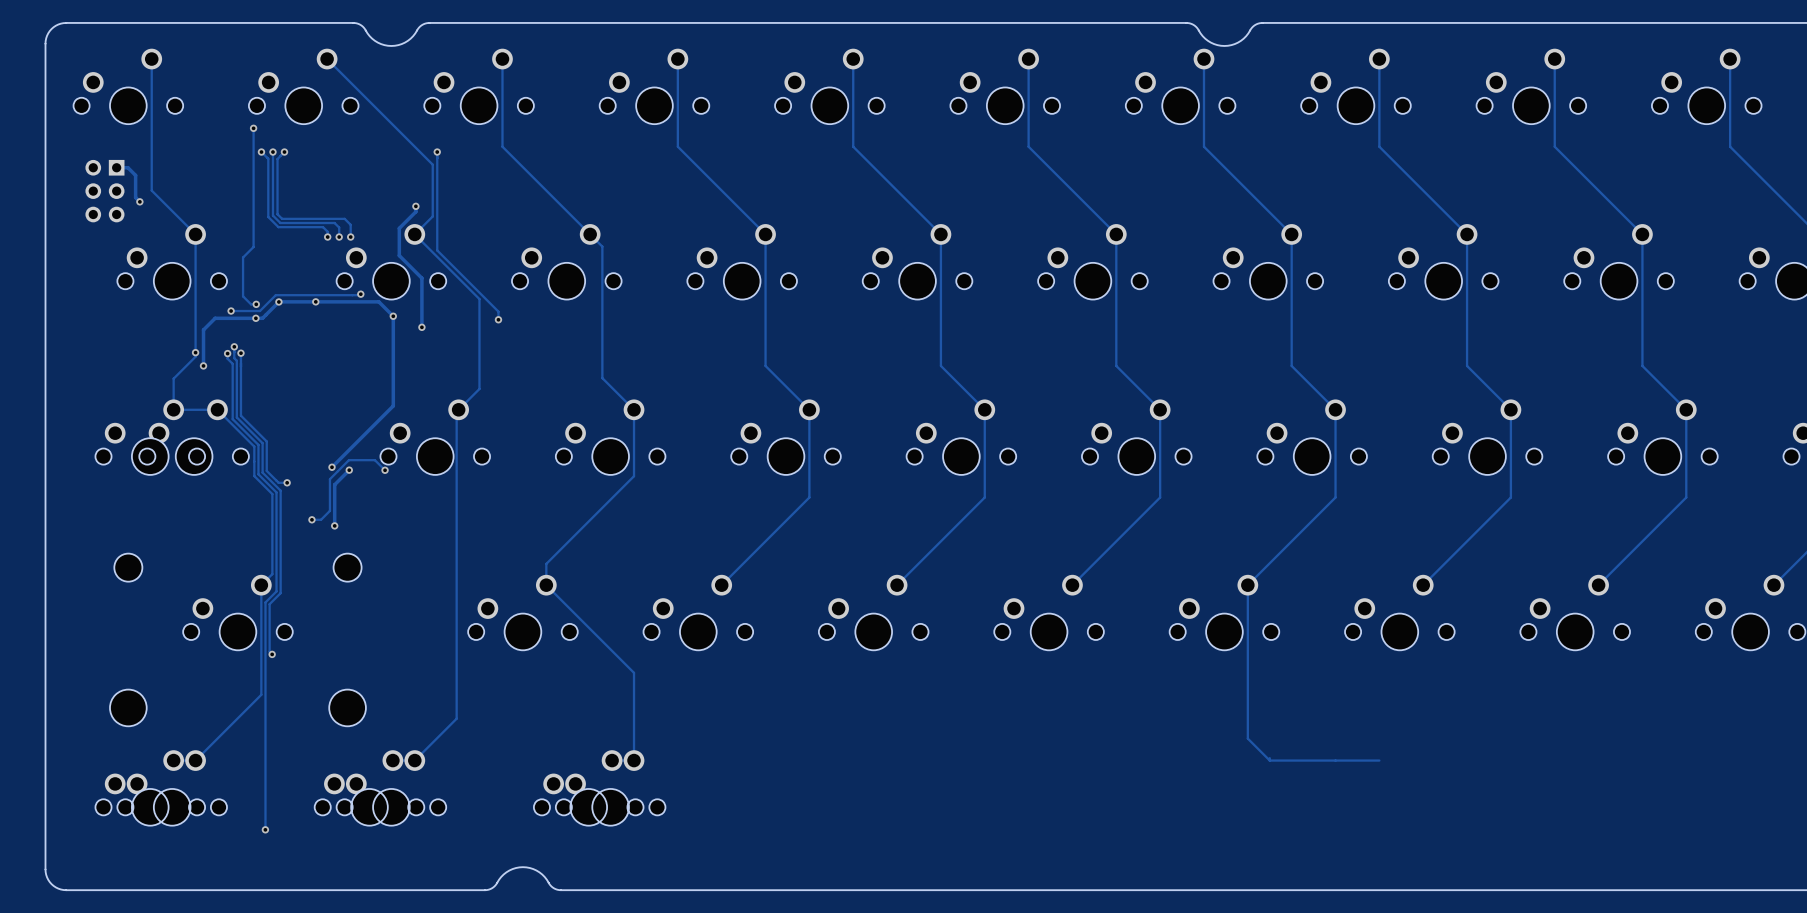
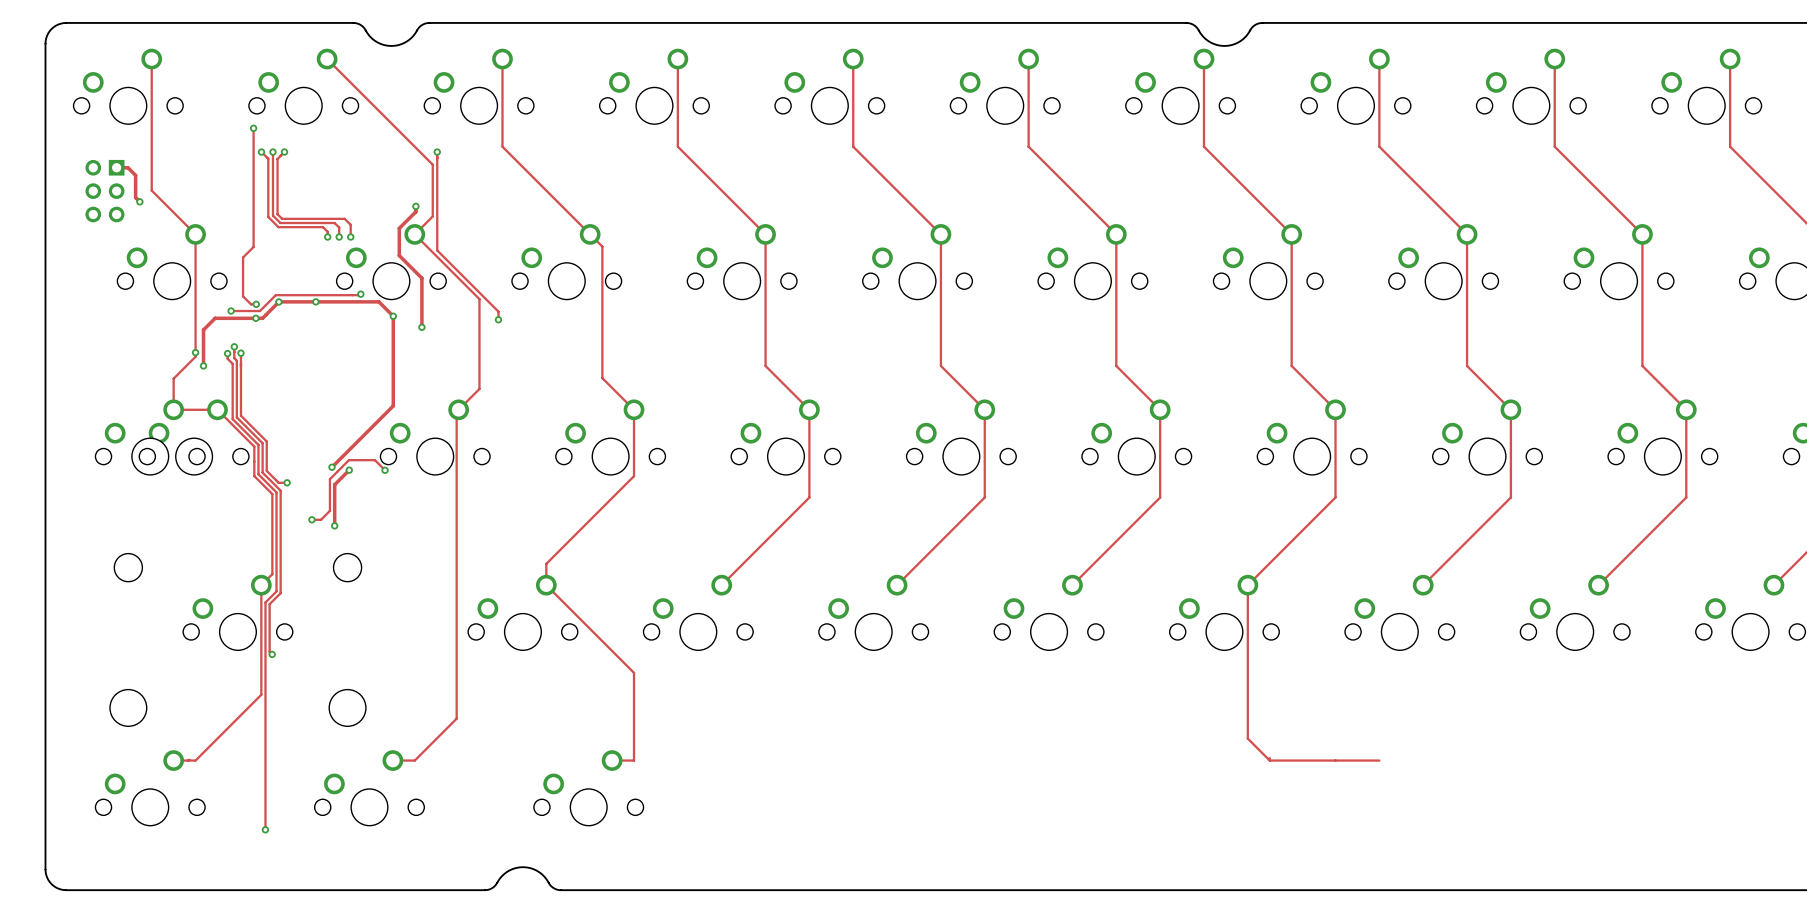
part: (172, 787) -> none
part: (391, 787) -> none
part: (610, 787) -> none

